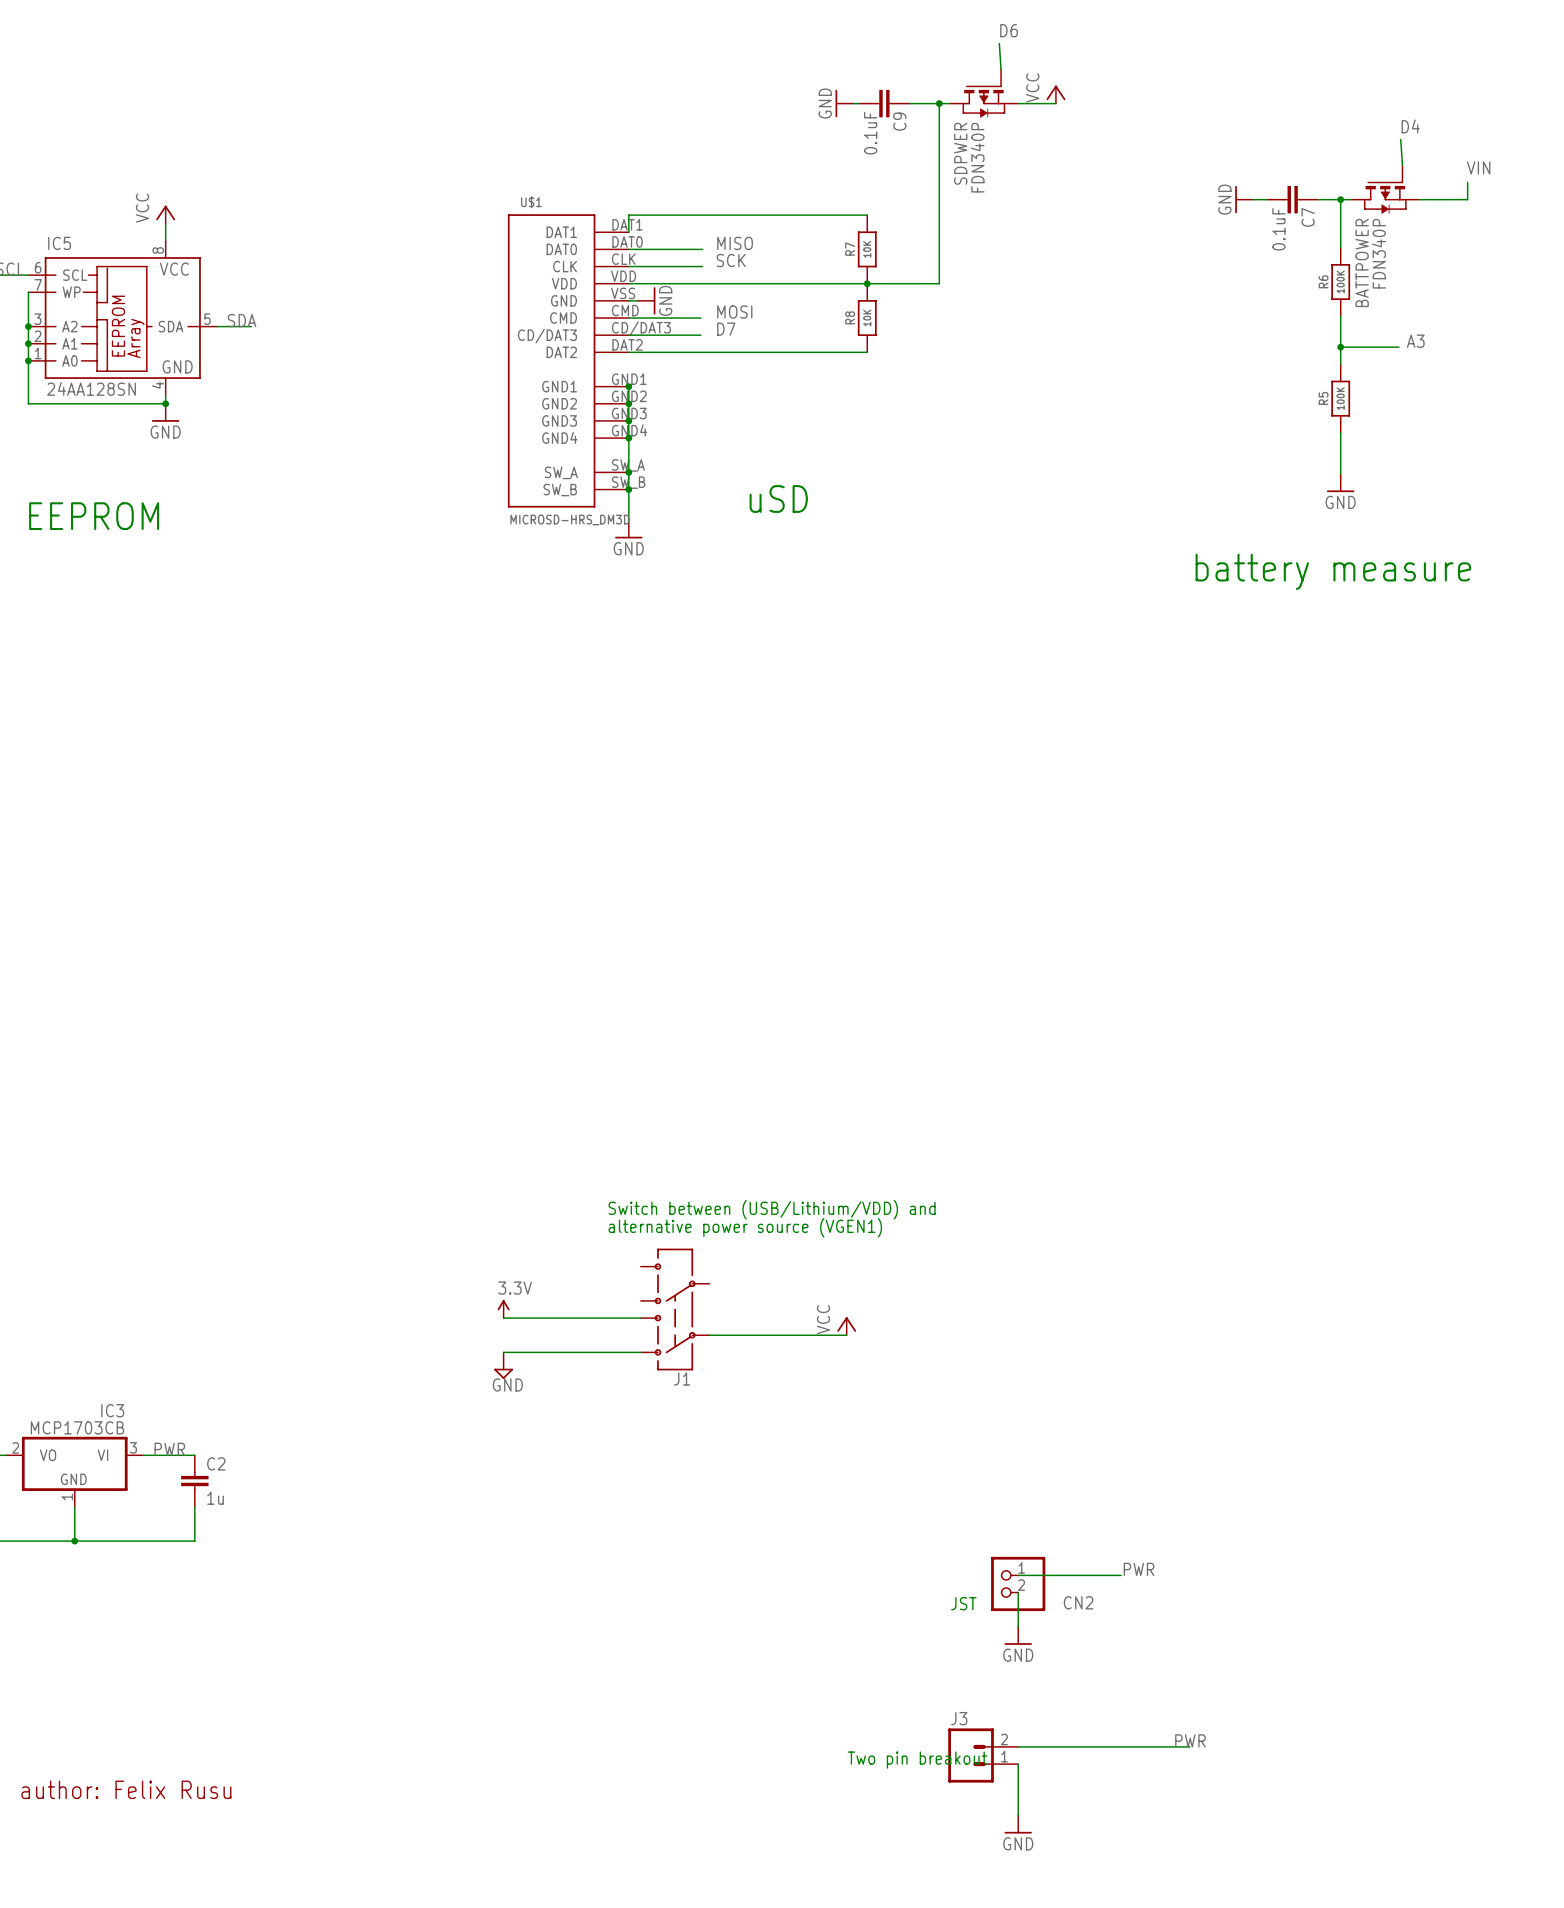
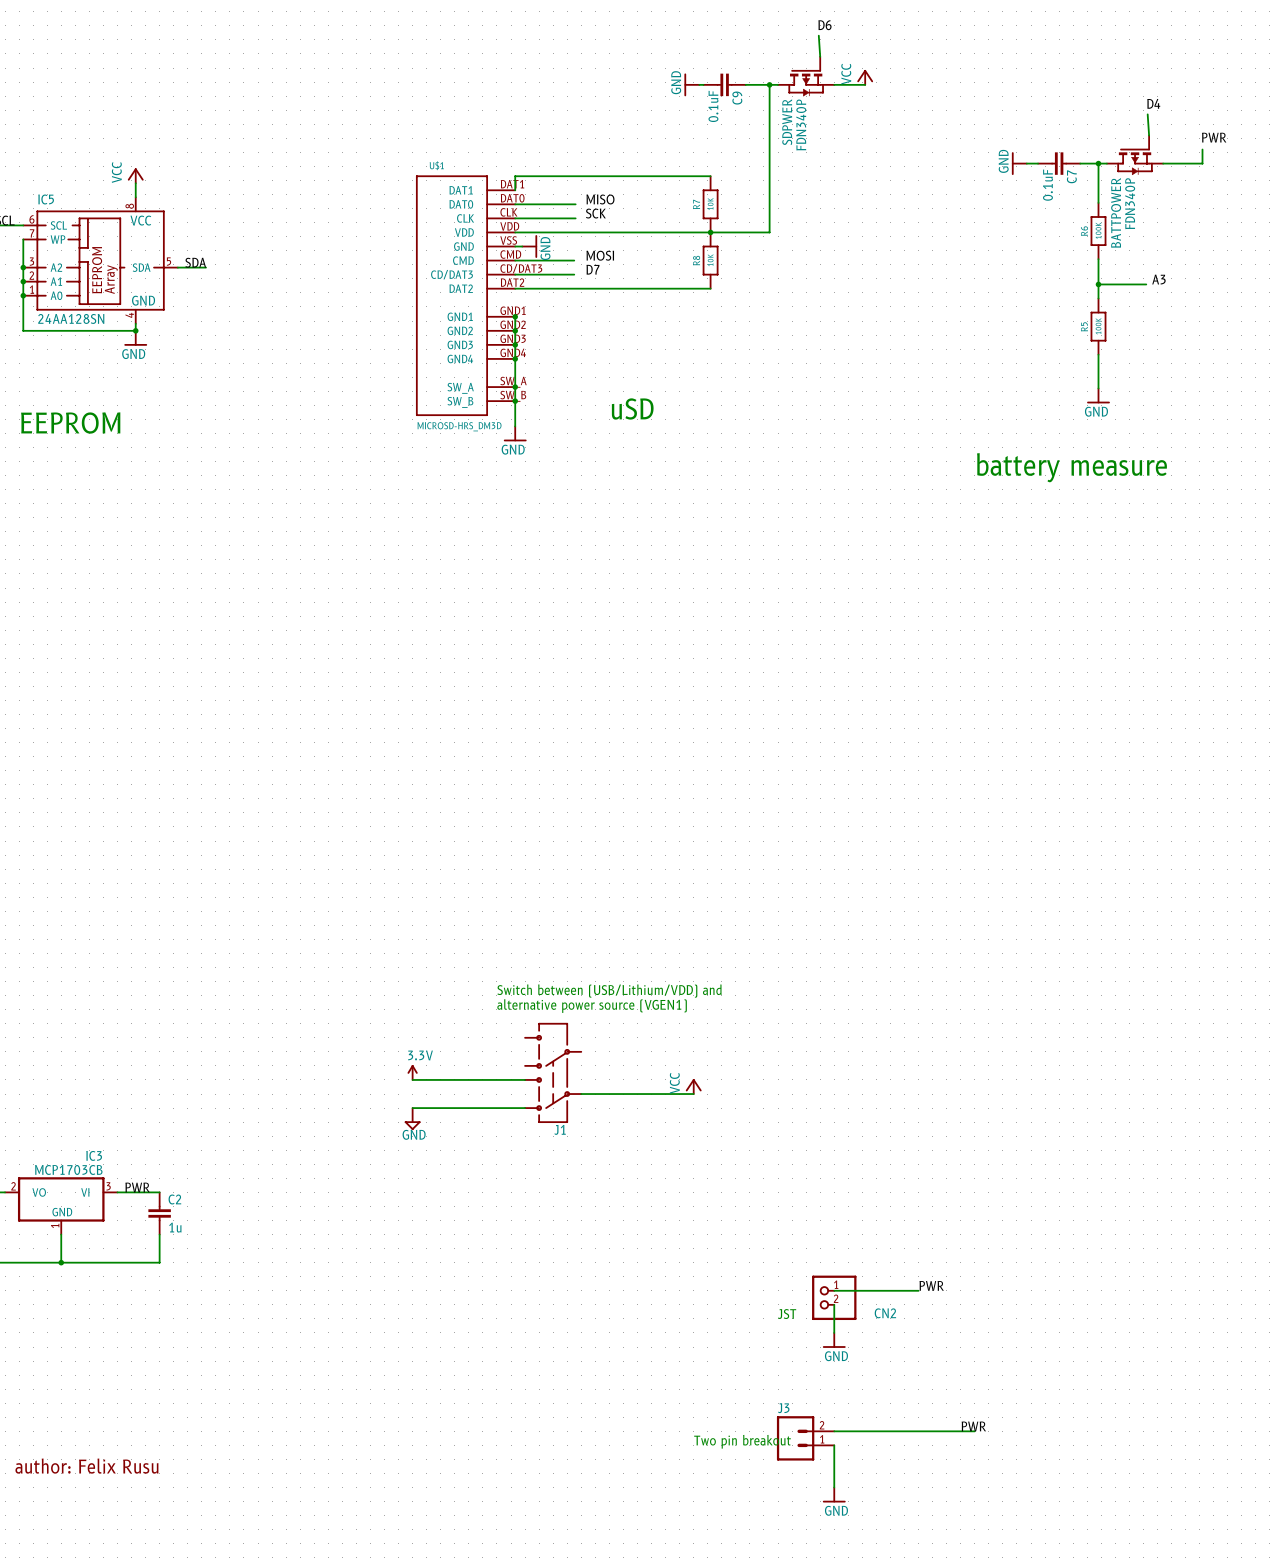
label: VIN (1478, 167) -> PWR (1214, 137)

